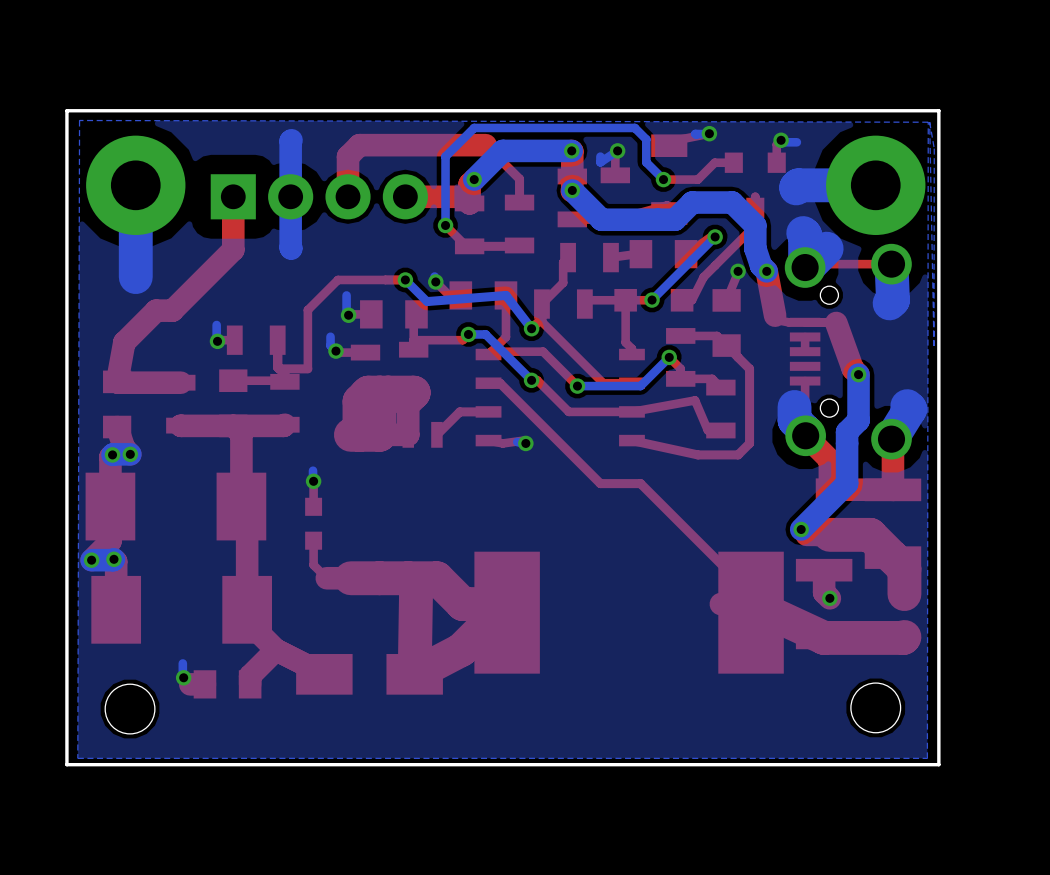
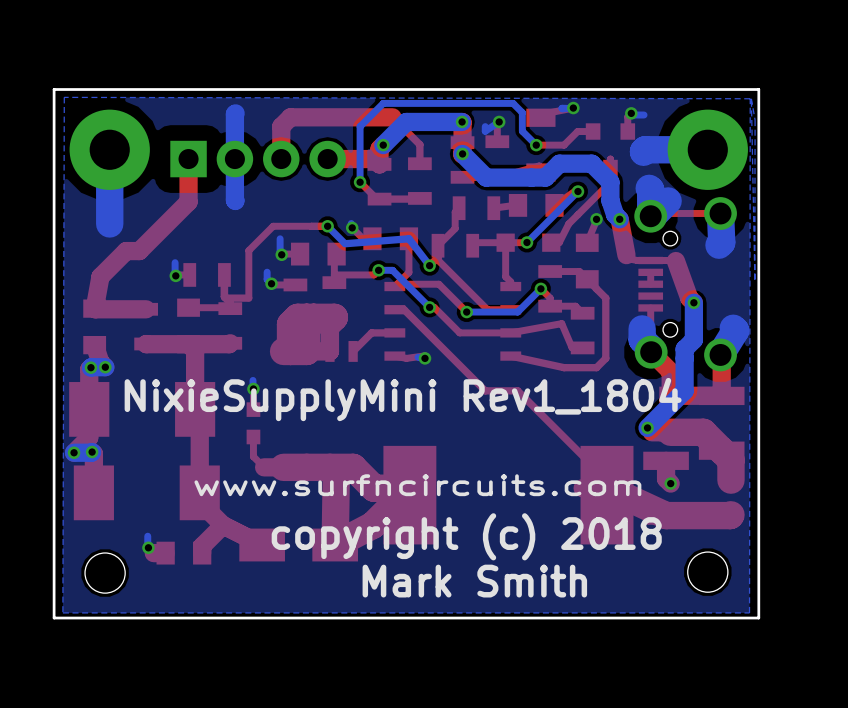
text: none -> NixieSupplyMini Rev1_1804 (403, 399)
text: none -> www.surfncircuits.com (417, 485)
text: none -> copyright (c) 2018 (466, 536)
text: none -> Mark Smith (474, 581)

